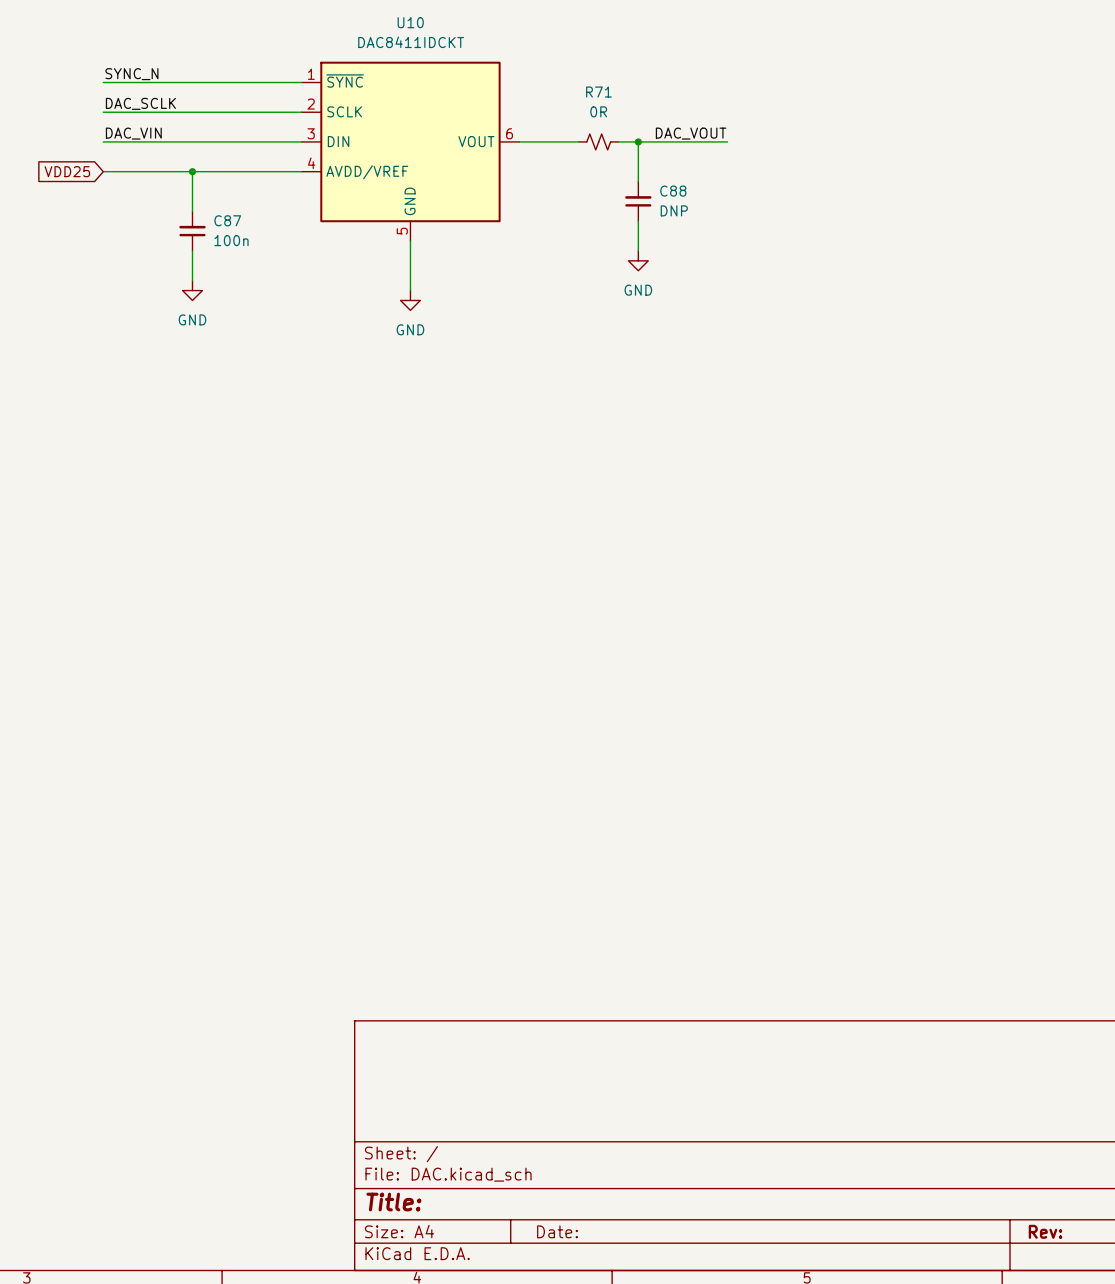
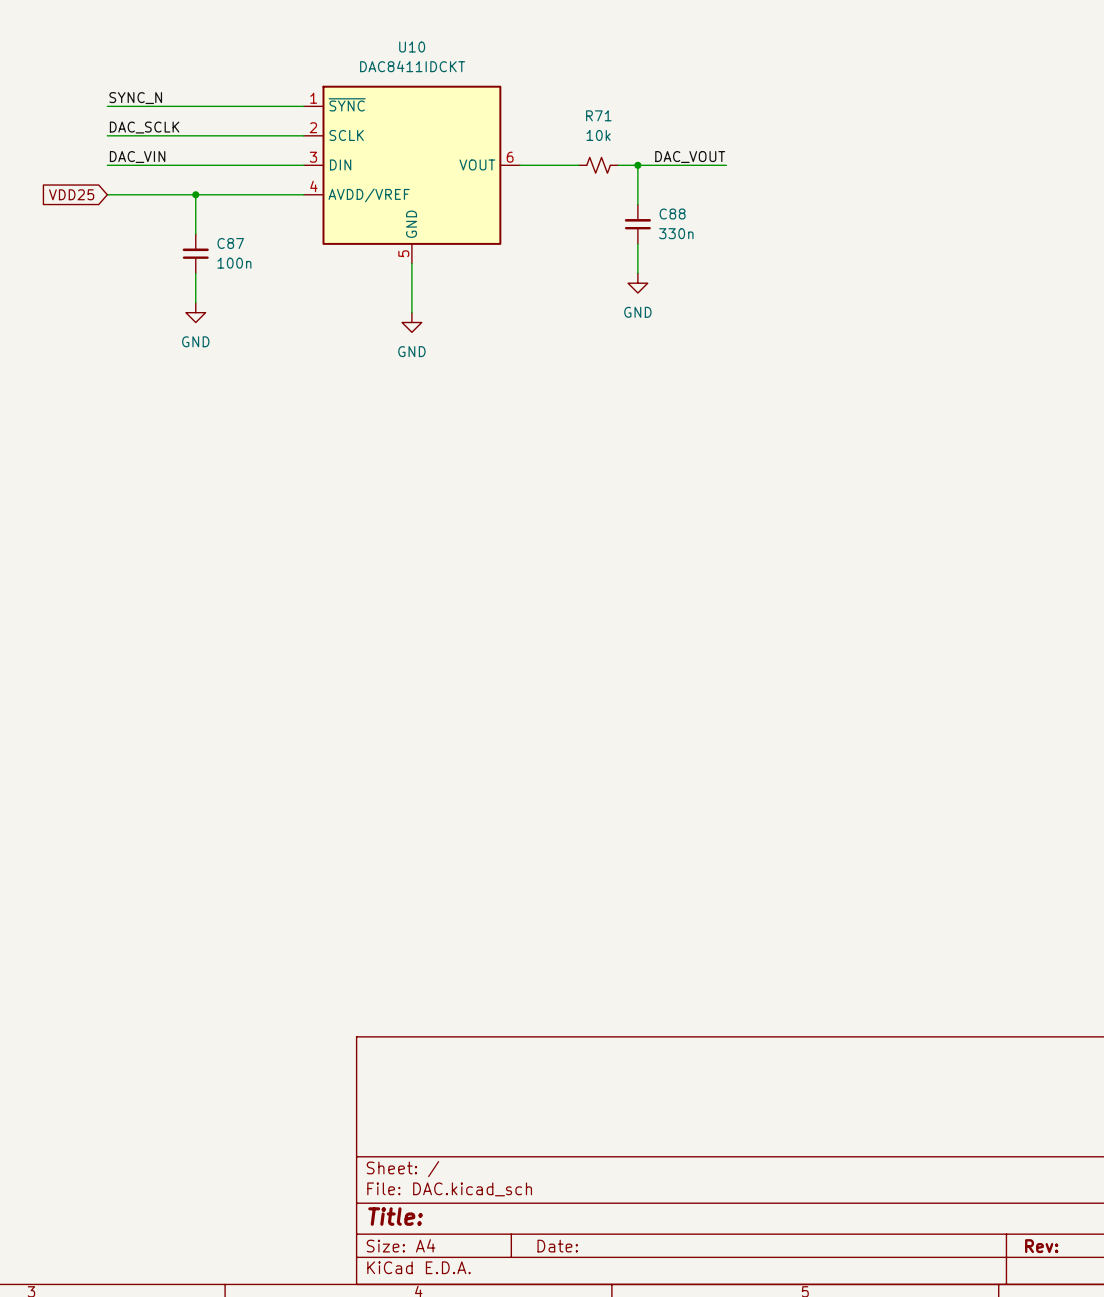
R71 value: 0R (598, 111) -> 10k (598, 135)
C88 value: DNP (674, 210) -> 330n (676, 233)

